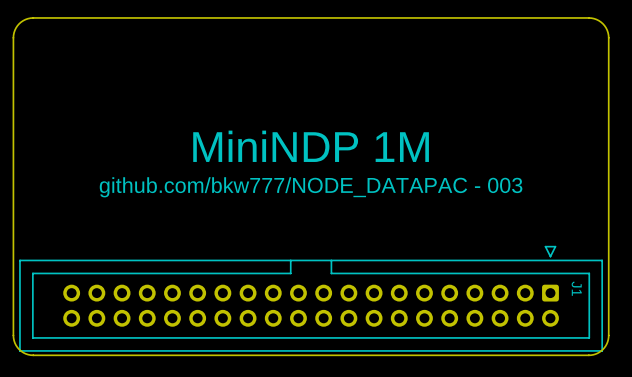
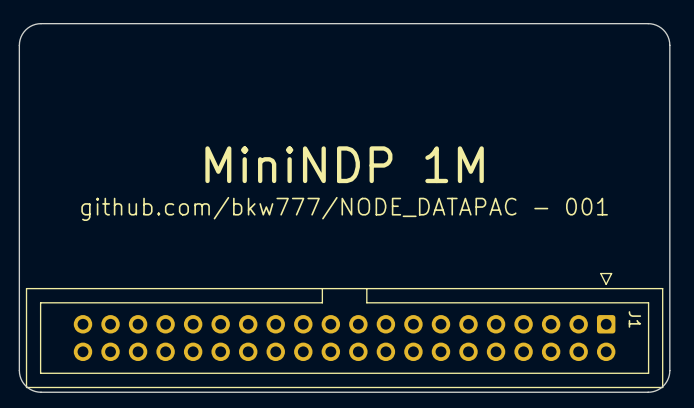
text: github.com/bkw777/NODE_DATAPAC - 003 (311, 187) -> github.com/bkw777/NODE_DATAPAC - 001 (344, 208)

